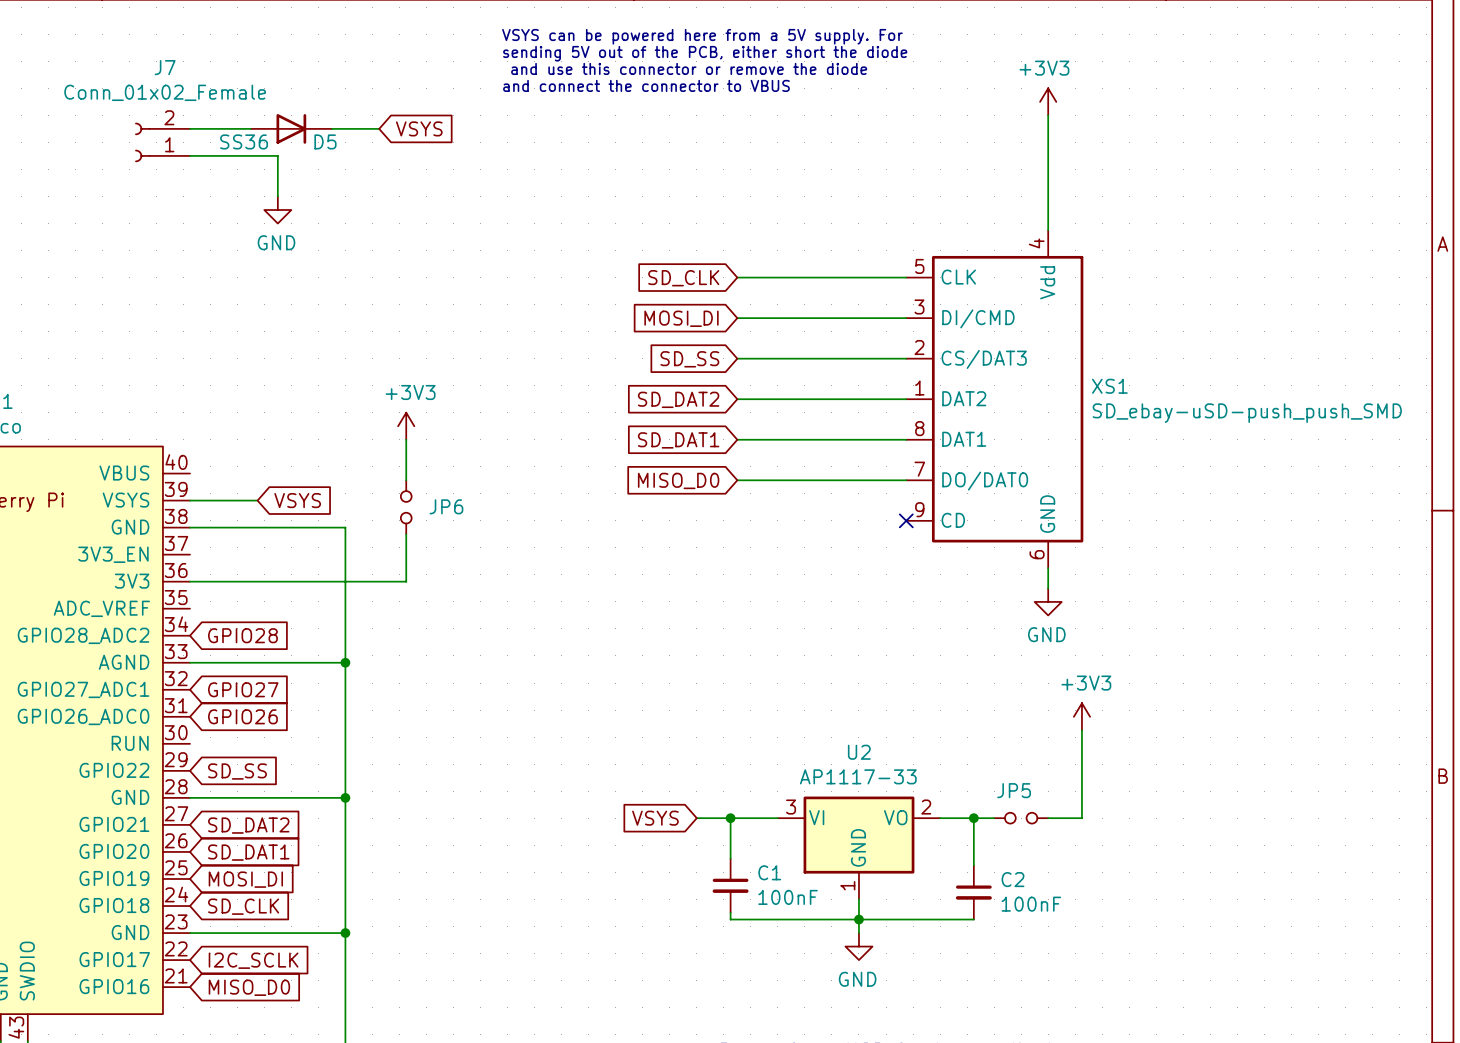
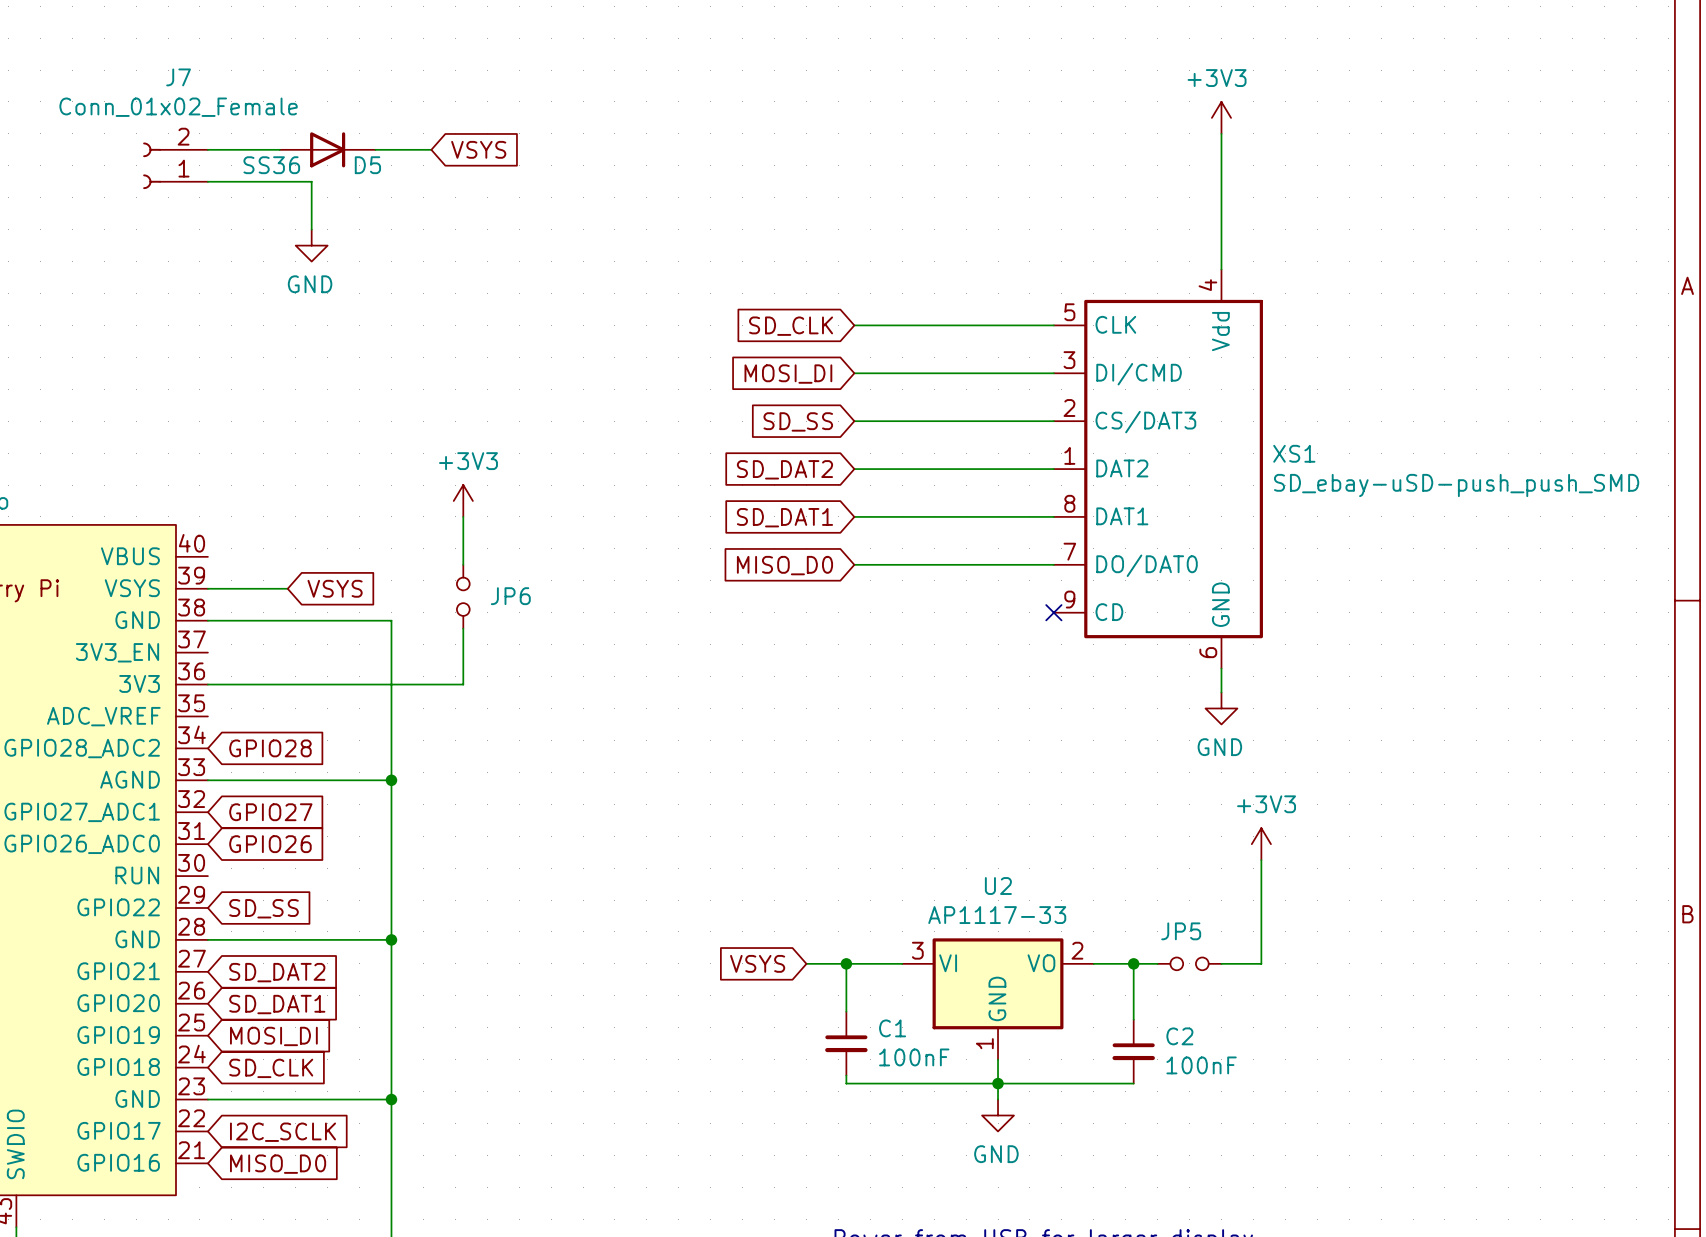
text: VSYS can be powered here from a 5V supply. For (702, 36) -> none
text: sending 5V out of the PCB, either short the diode (705, 53) -> none
text: and use this connector or remove the diode (689, 68) -> none
text: and connect the connector to VBUS (646, 85) -> none

